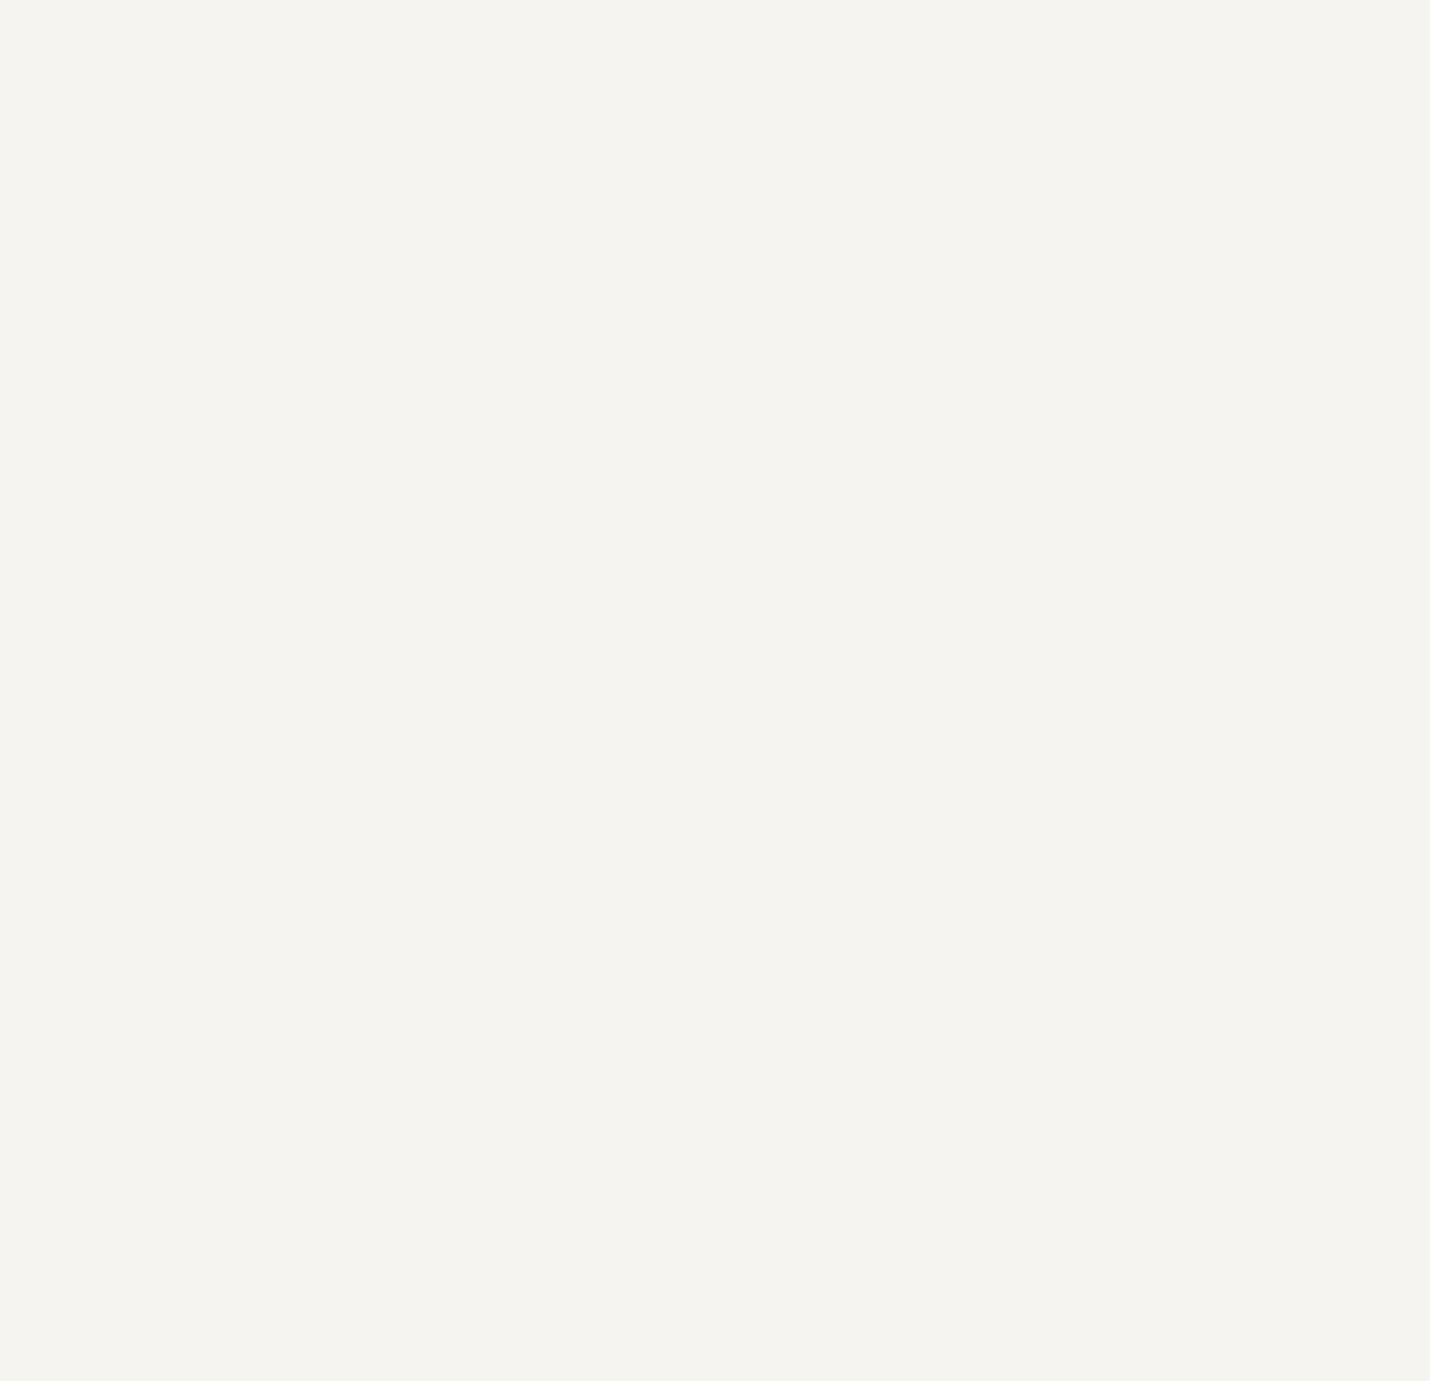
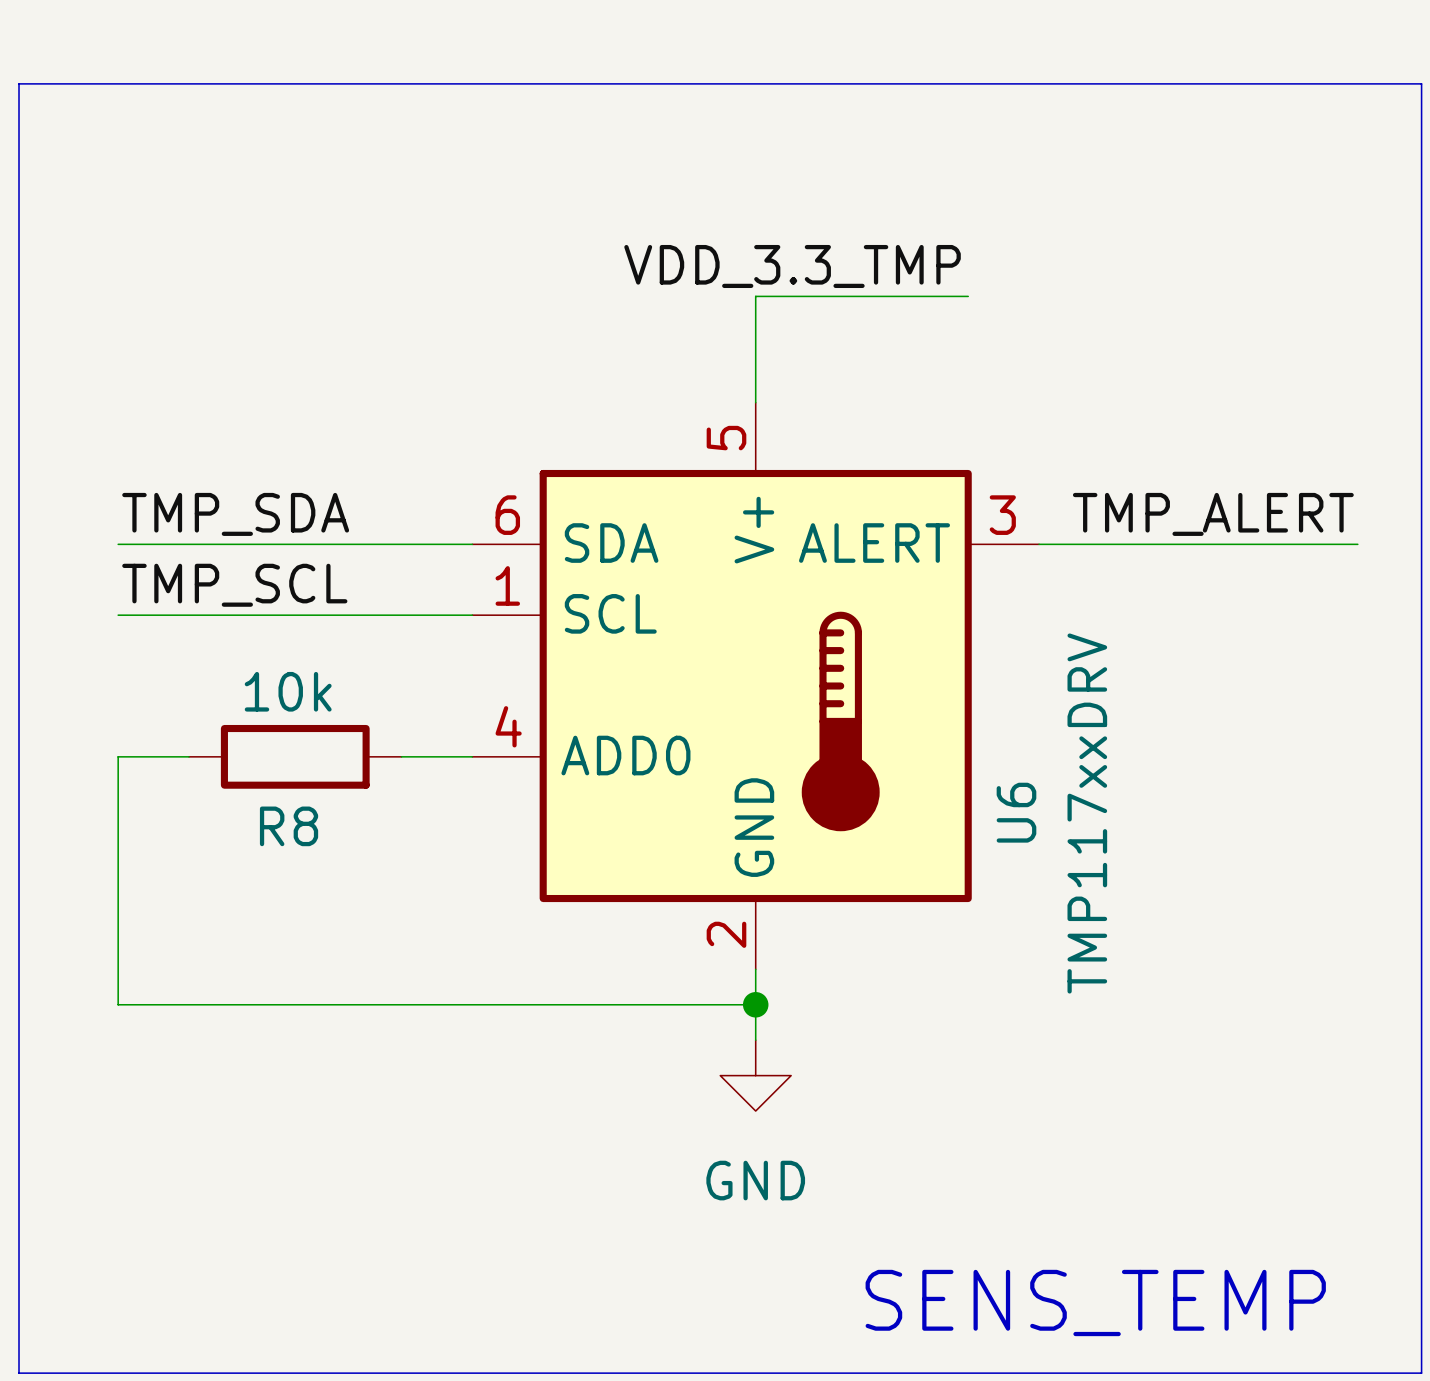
line: none -> (19, 83) (19, 1373) (1421, 1373) (1421, 83) (19, 83)
label: none -> VDD_3.3_TMP (792, 266)
wire: none -> (968, 296) (755, 296) (755, 402)
label: none -> TMP_SDA (235, 514)
label: none -> TMP_ALERT (1213, 514)
wire: none -> (118, 544) (472, 544)
wire: none -> (1039, 544) (1357, 544)
label: none -> TMP_SCL (234, 585)
wire: none -> (118, 615) (472, 615)
U6: none -> TMP117xxDRV (755, 686)
wire: none -> (189, 756) (118, 756) (118, 1004) (755, 1004)
R8: none -> 10k (295, 756)
wire: none -> (401, 756) (472, 756)
wire: none -> (755, 969) (755, 1040)
junction: none -> (755, 1004)
power symbol: none -> GND (755, 1075)
text: none -> SENS_TEMP (1095, 1302)

